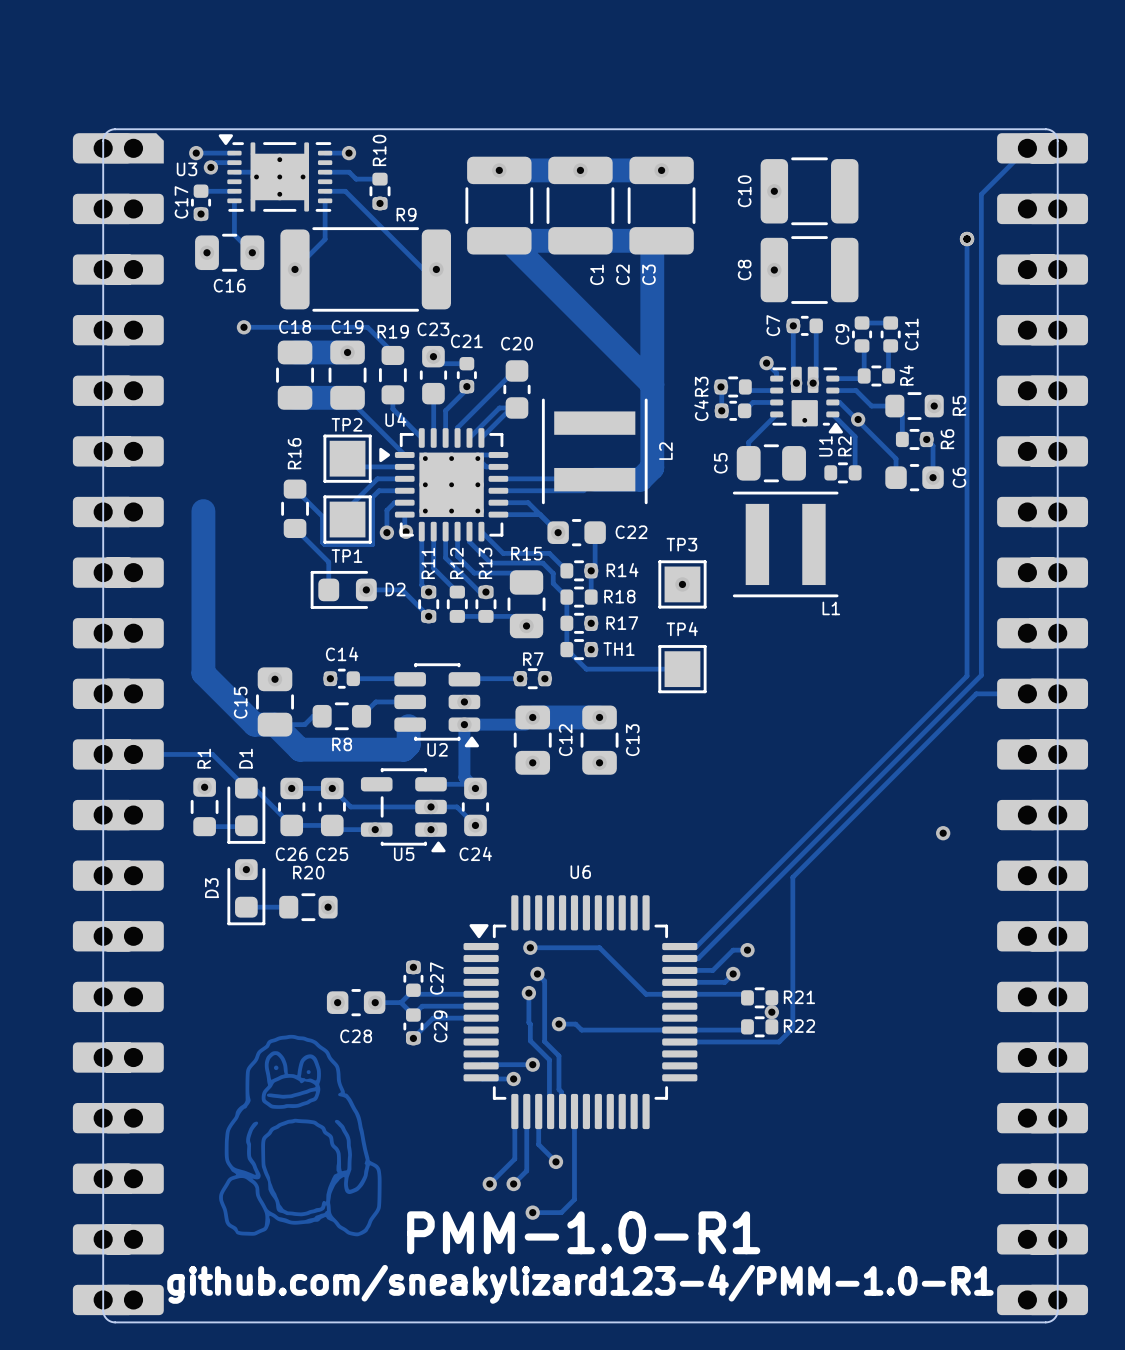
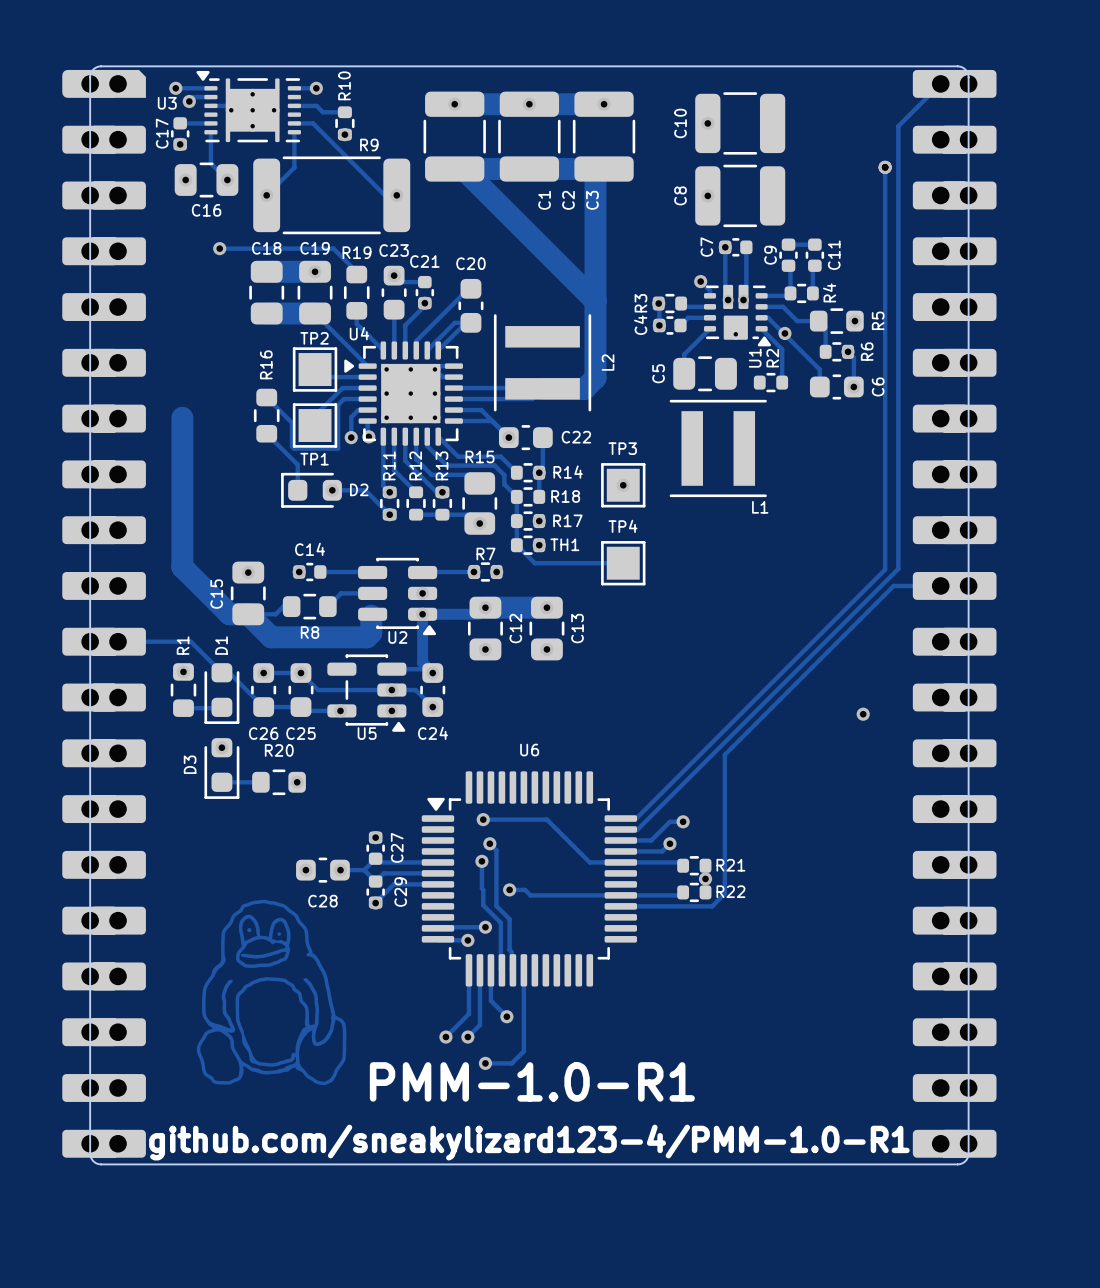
text position: github.com/sneakylizard123-4/PMM-1.0-R1 (580, 1284) -> github.com/sneakylizard123-4/PMM-1.0-R1 (529, 1142)

